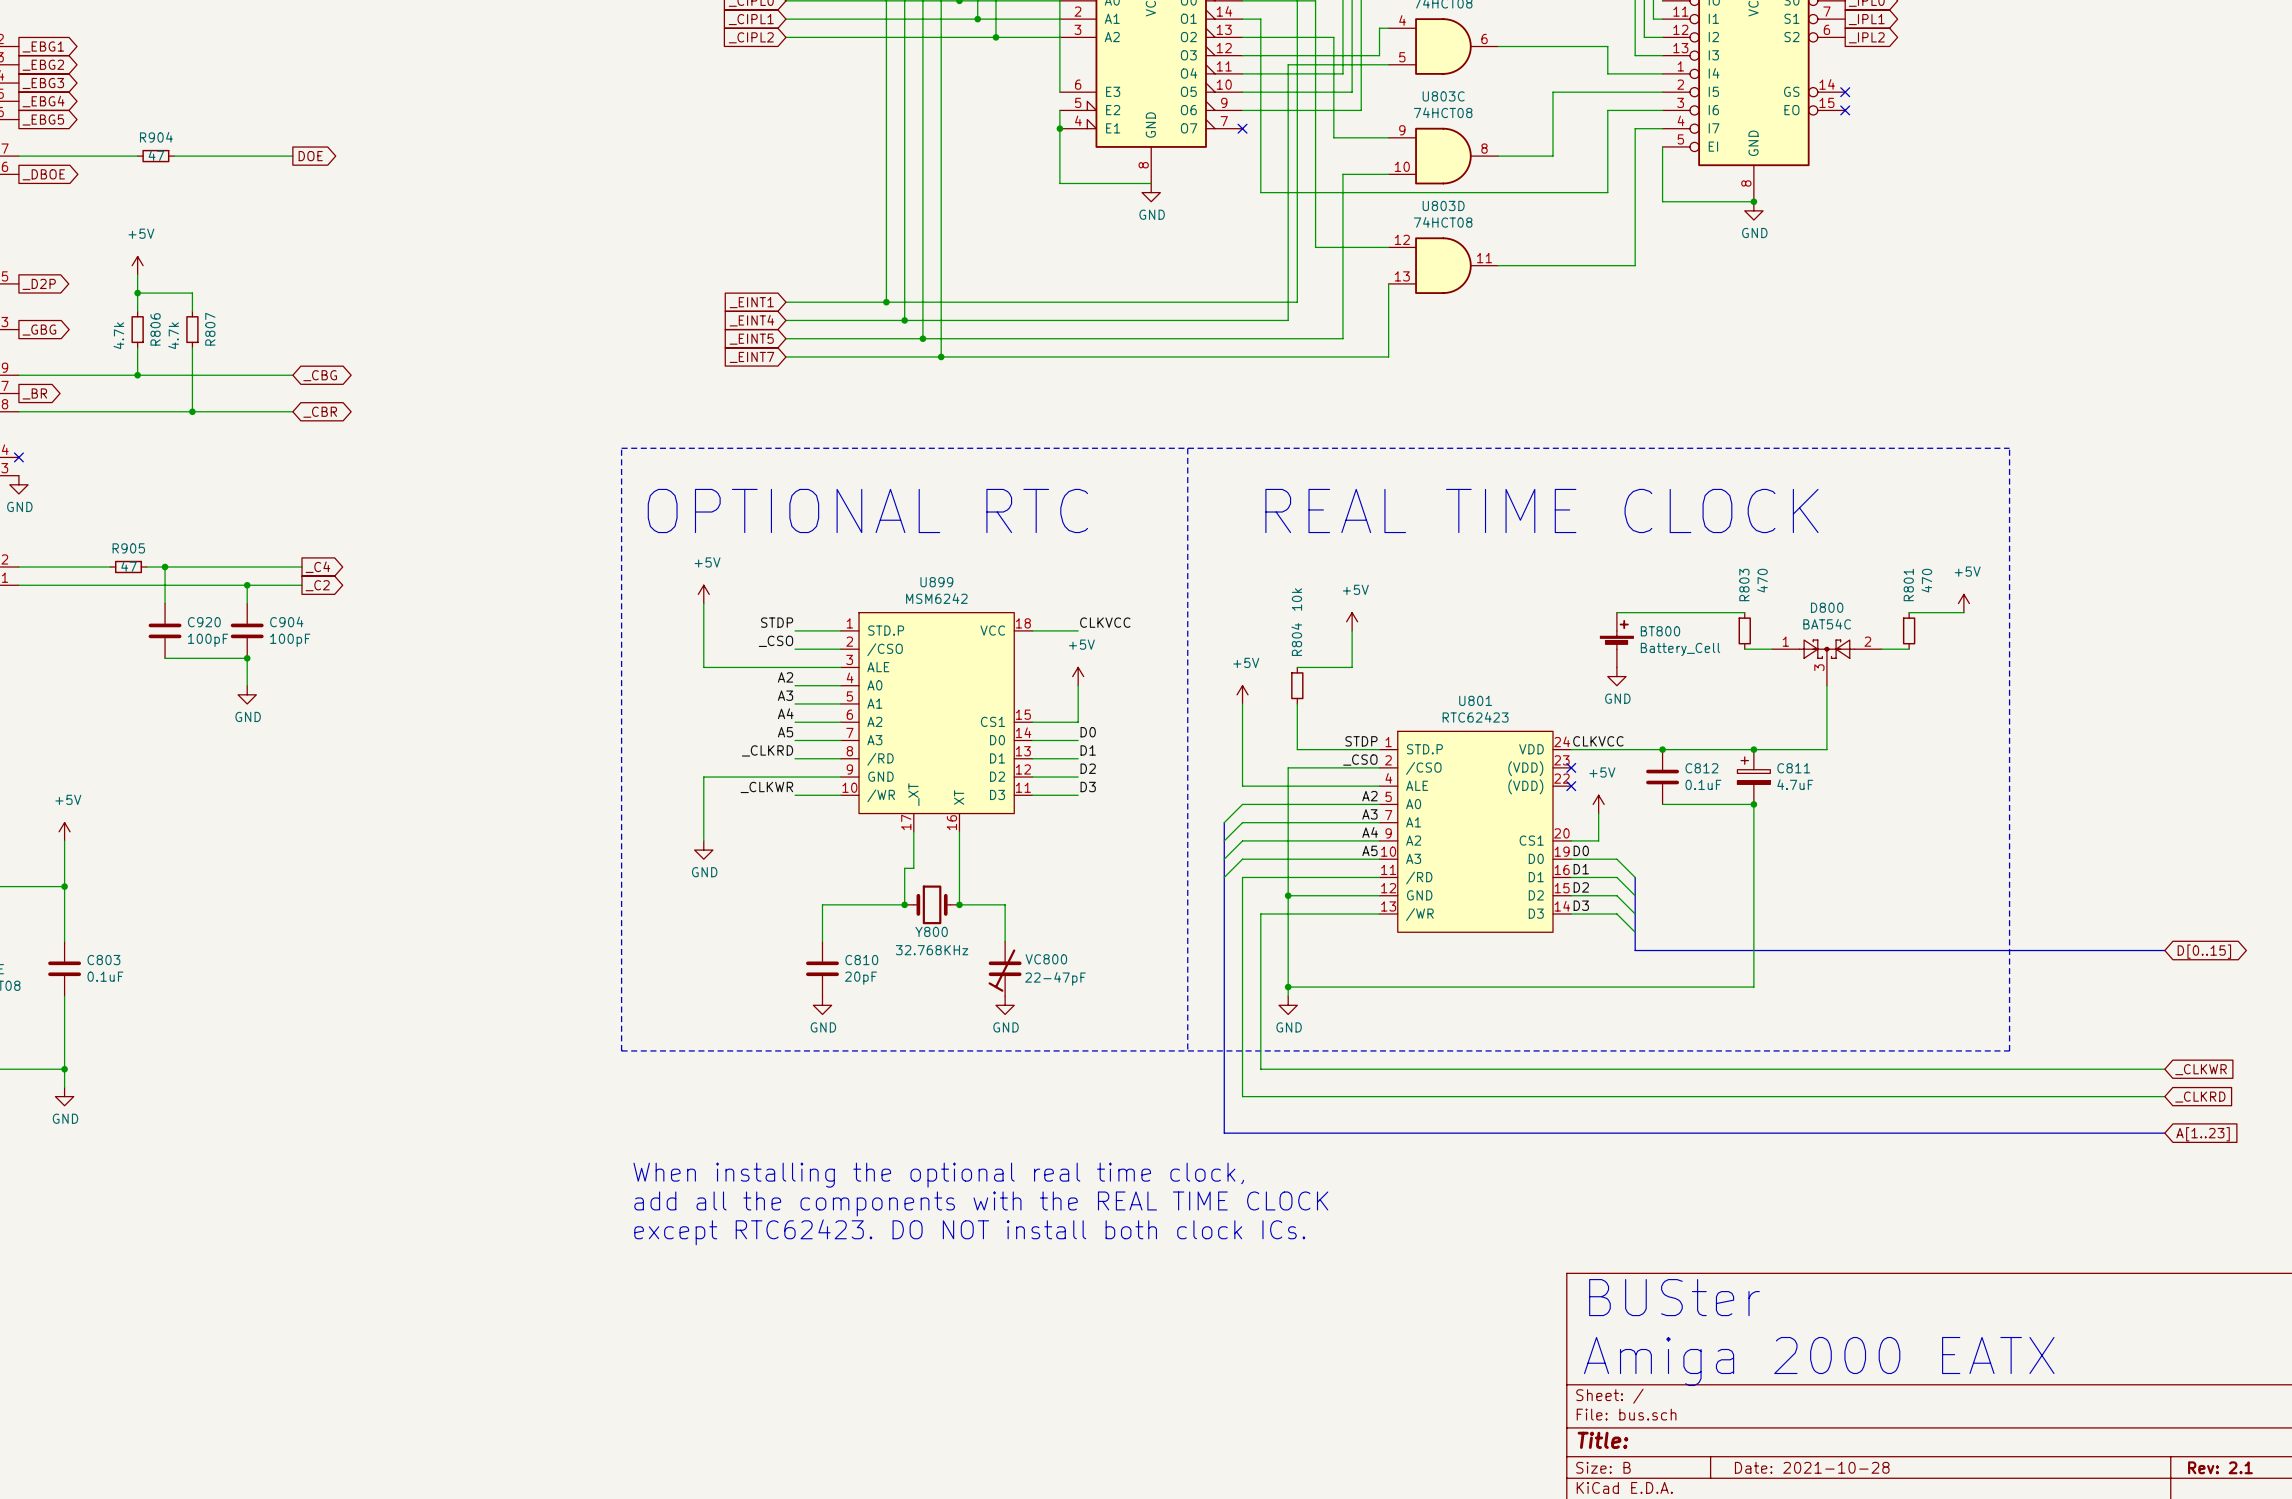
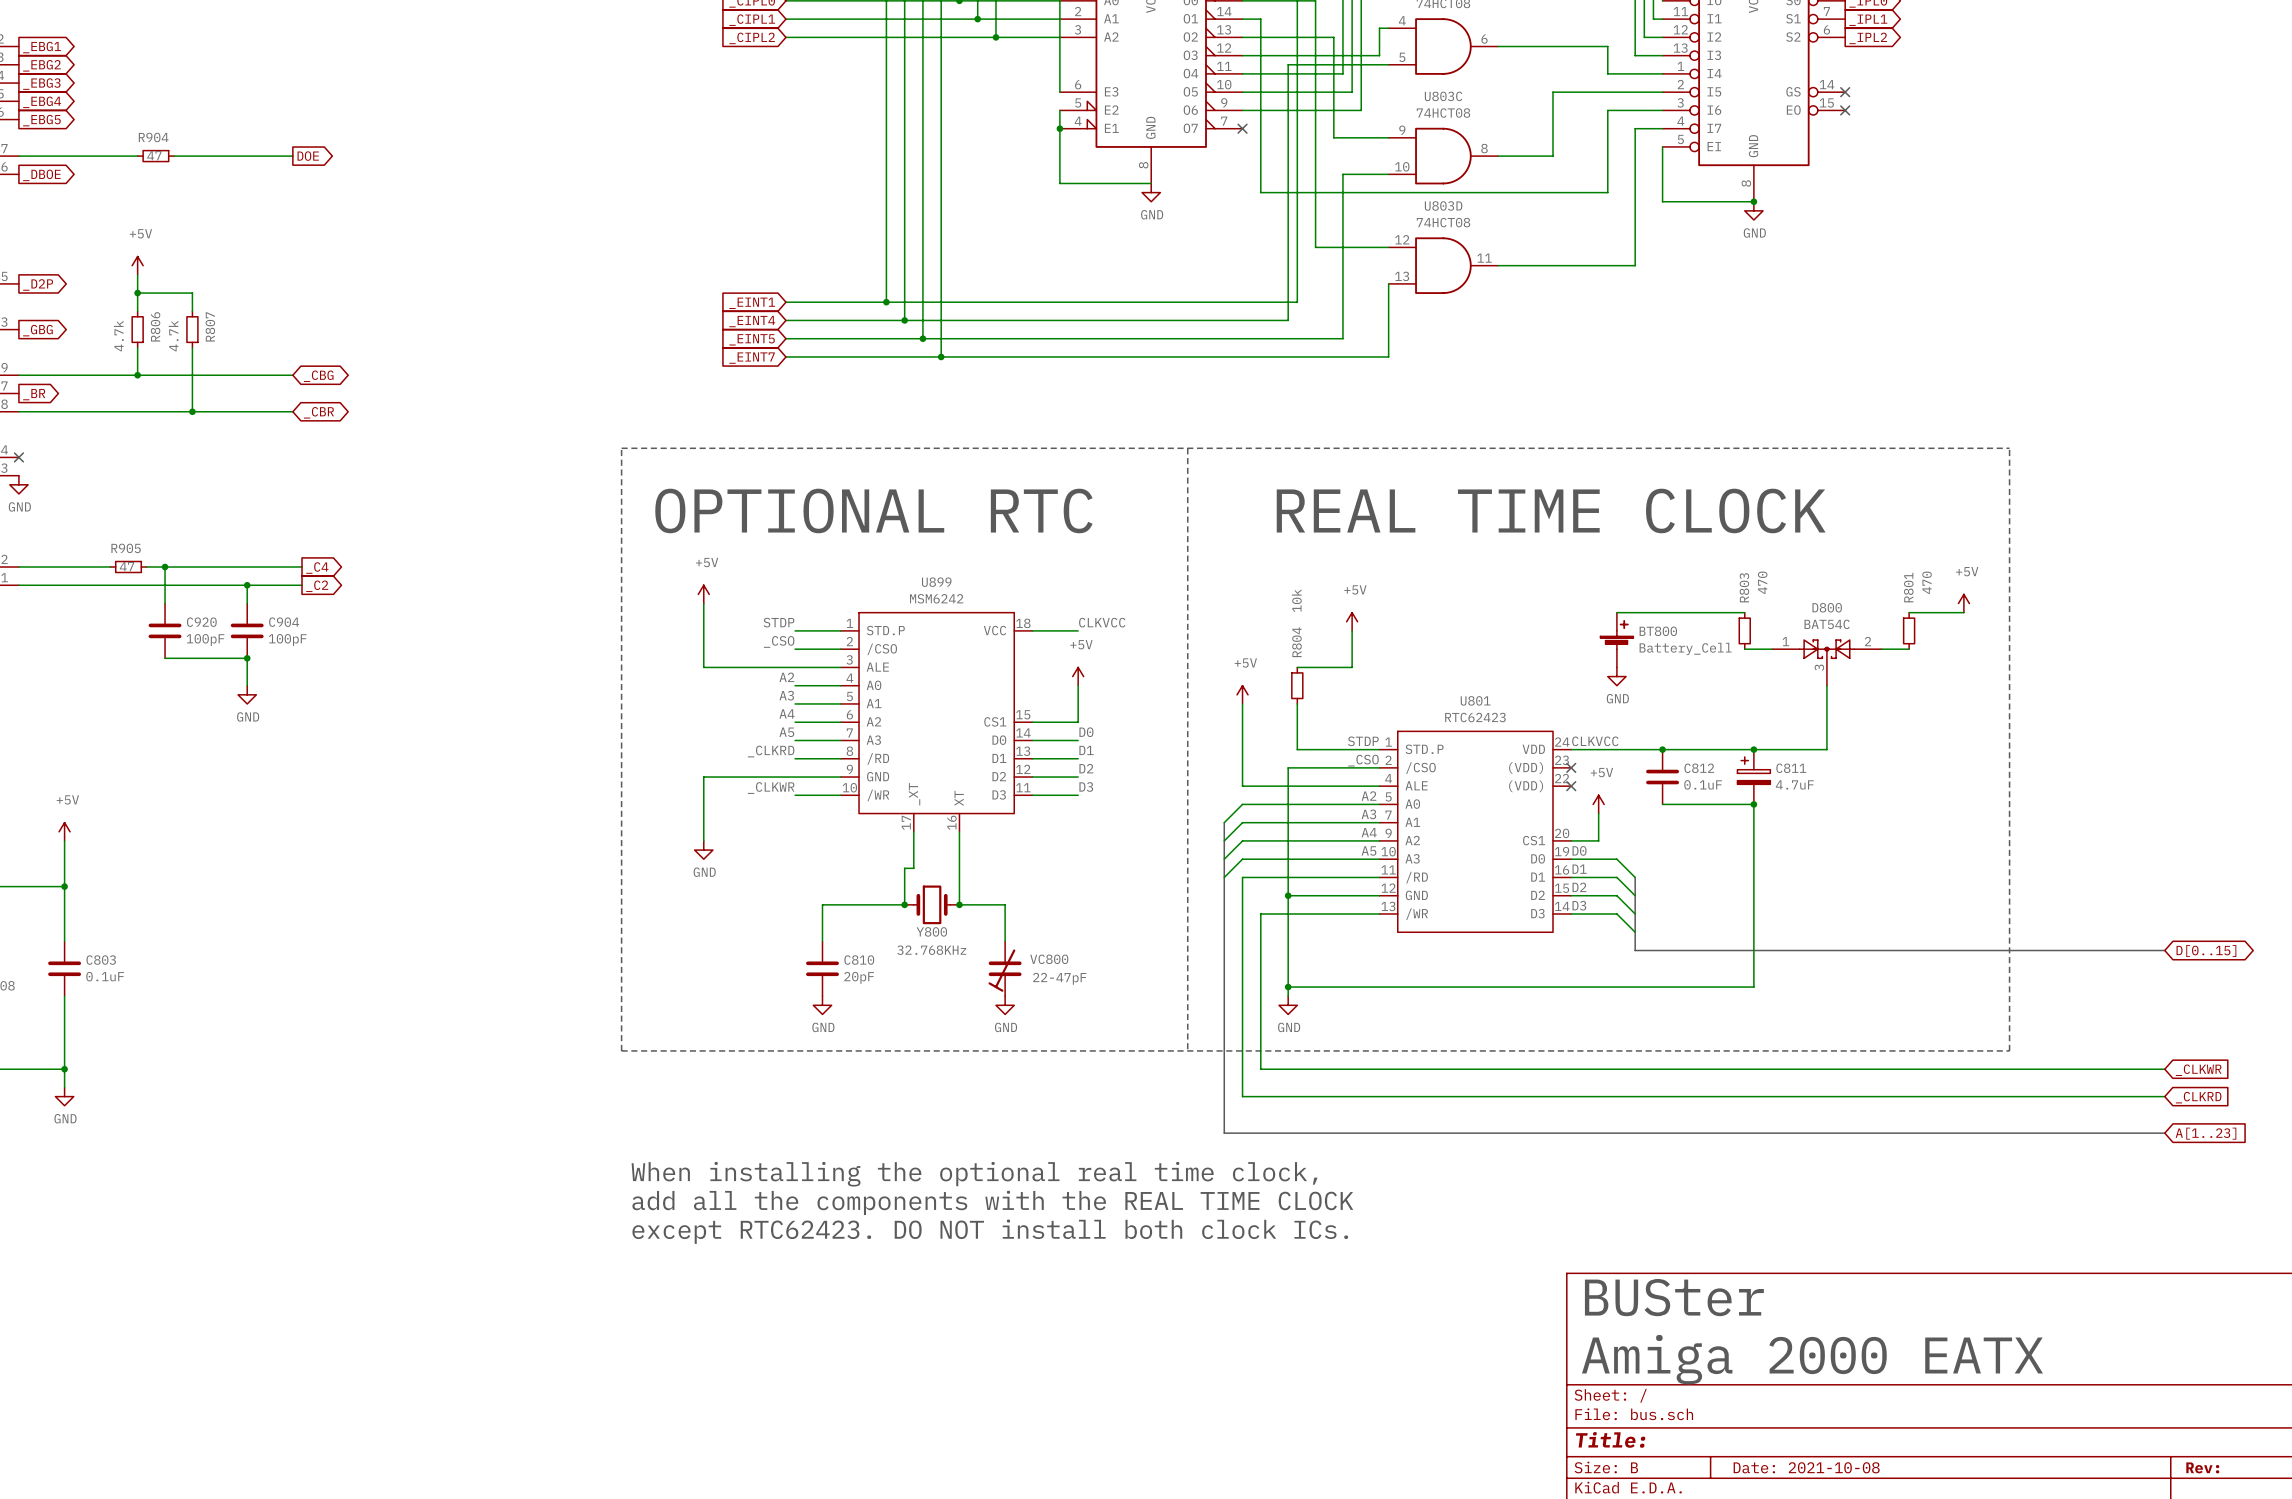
title block: Date: 2021-10-28 (1812, 1467) -> Date: 2021-10-08 (1806, 1467)
title block: Rev: 2.1 (2220, 1467) -> Rev: (2202, 1467)

